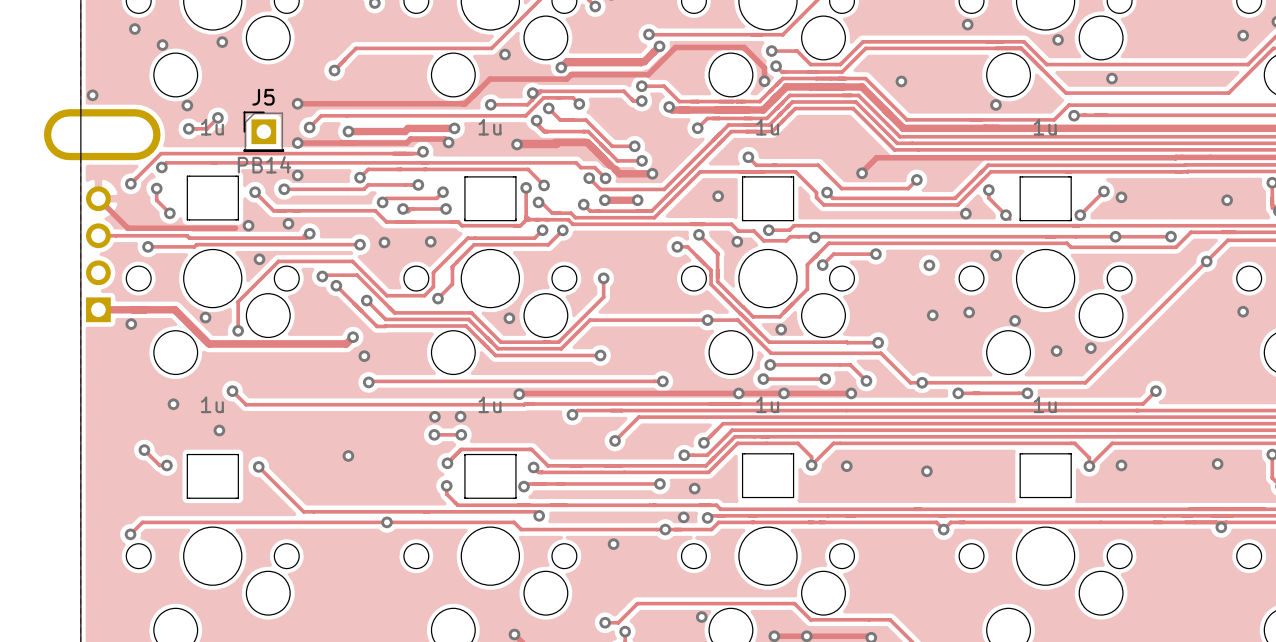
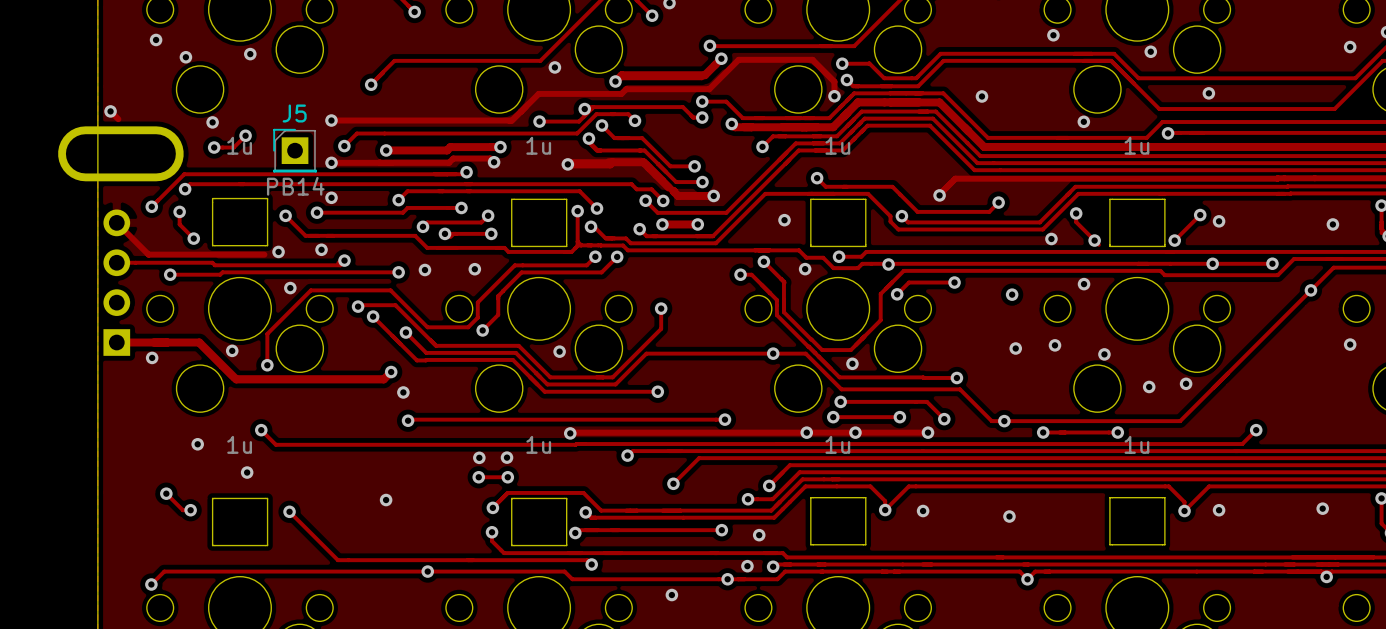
track: none -> (110, 111) (118, 119)

